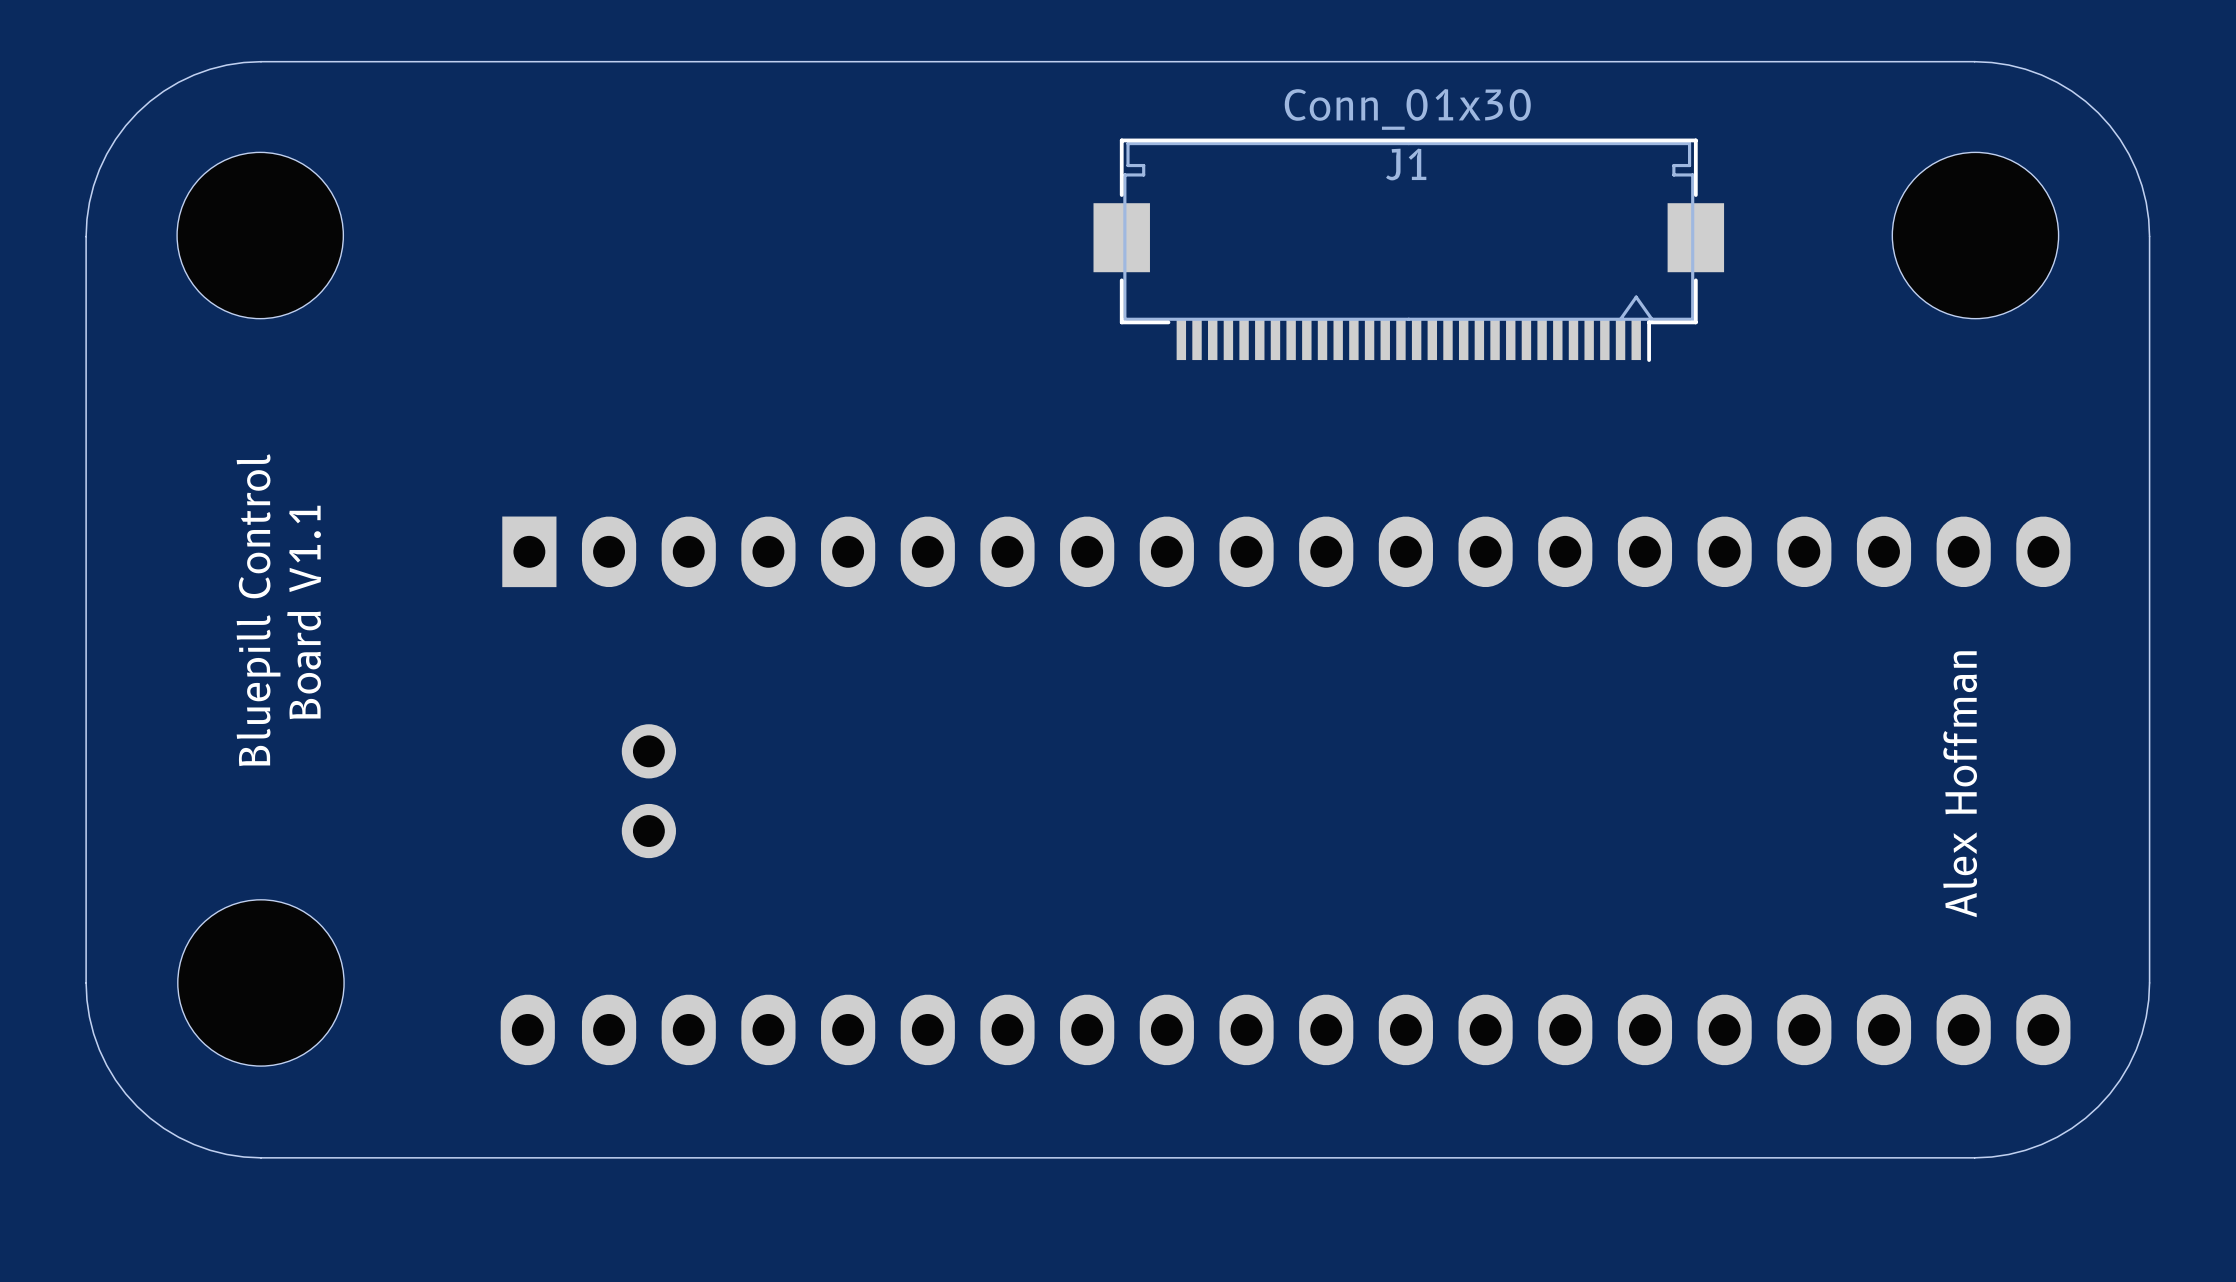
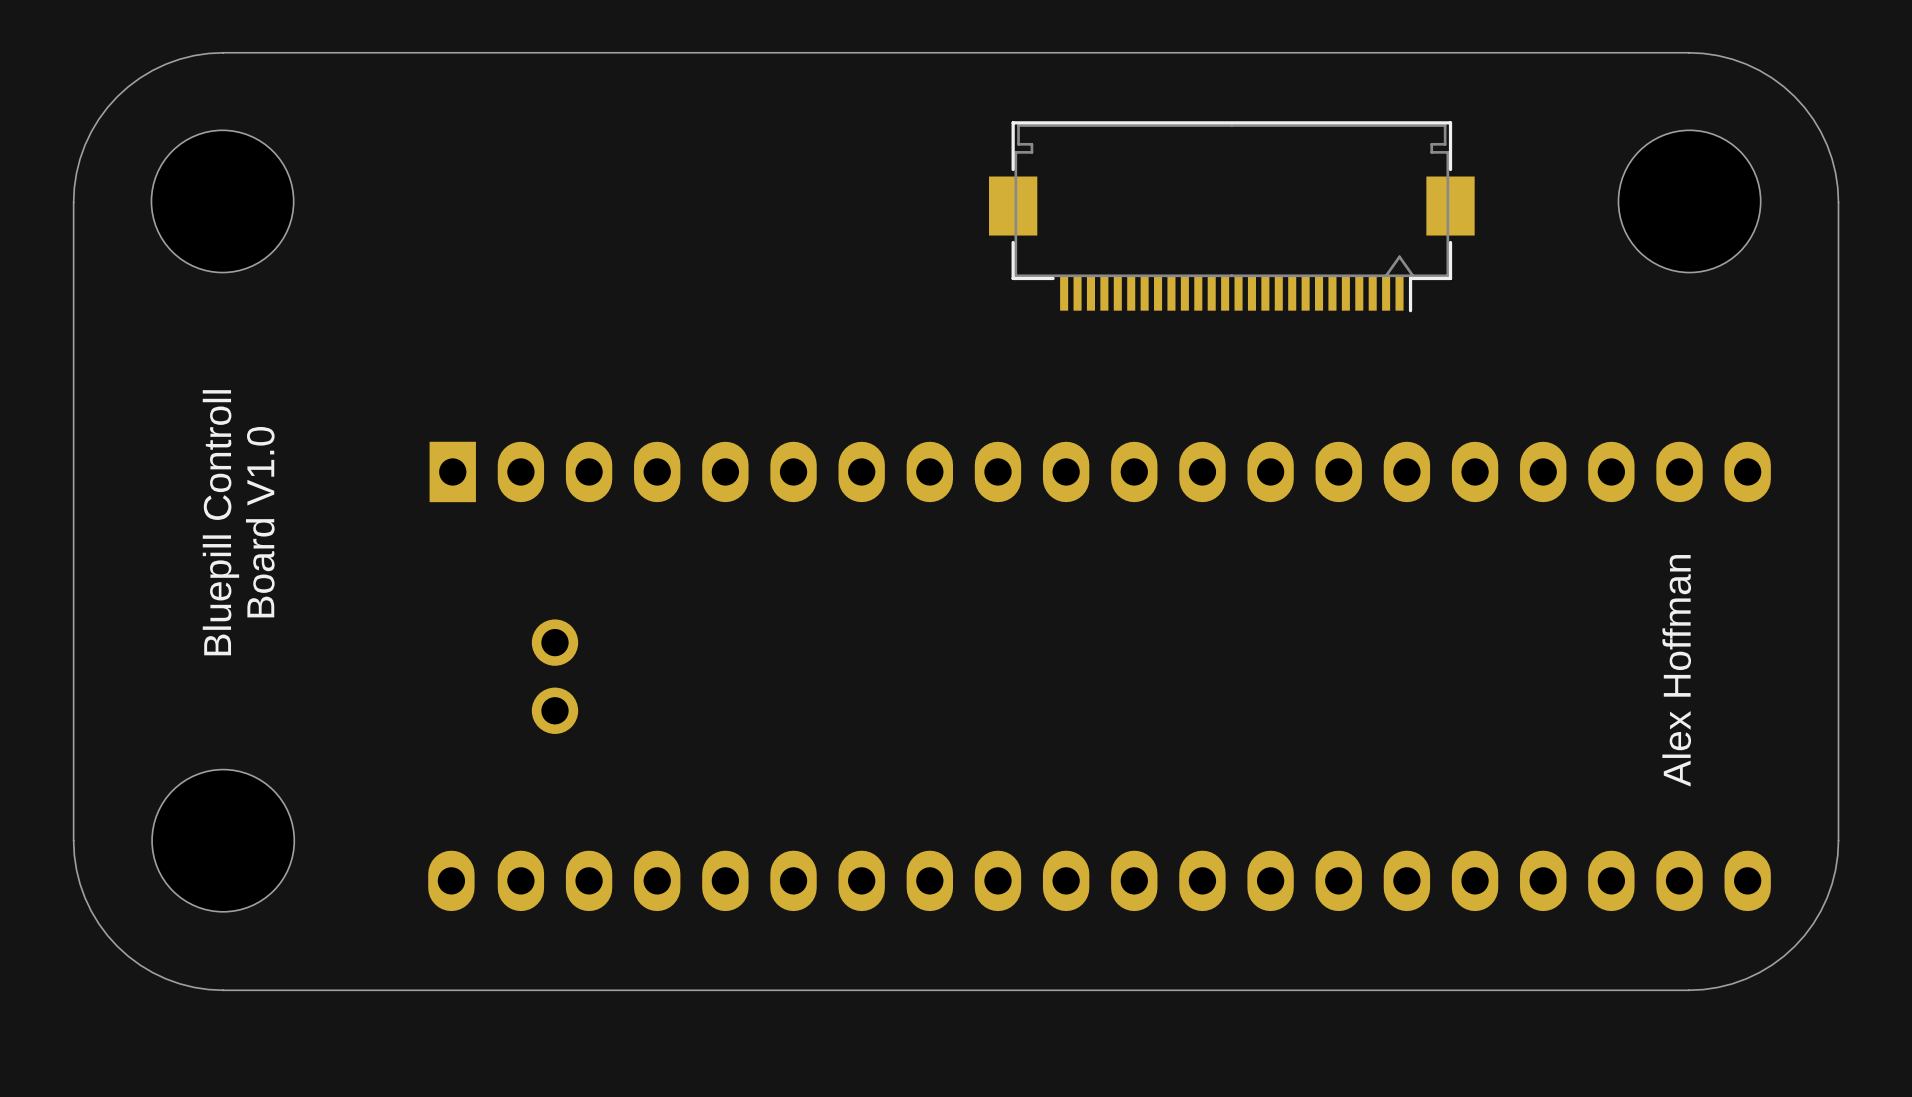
J1: Conn_01x30 (1408, 250) -> none
part: none -> (1231, 216)
text: Bluepill Control (258, 610) -> Bluepill Controll (220, 522)
text: Board V1.1 (304, 612) -> Board V1.0 (260, 522)

